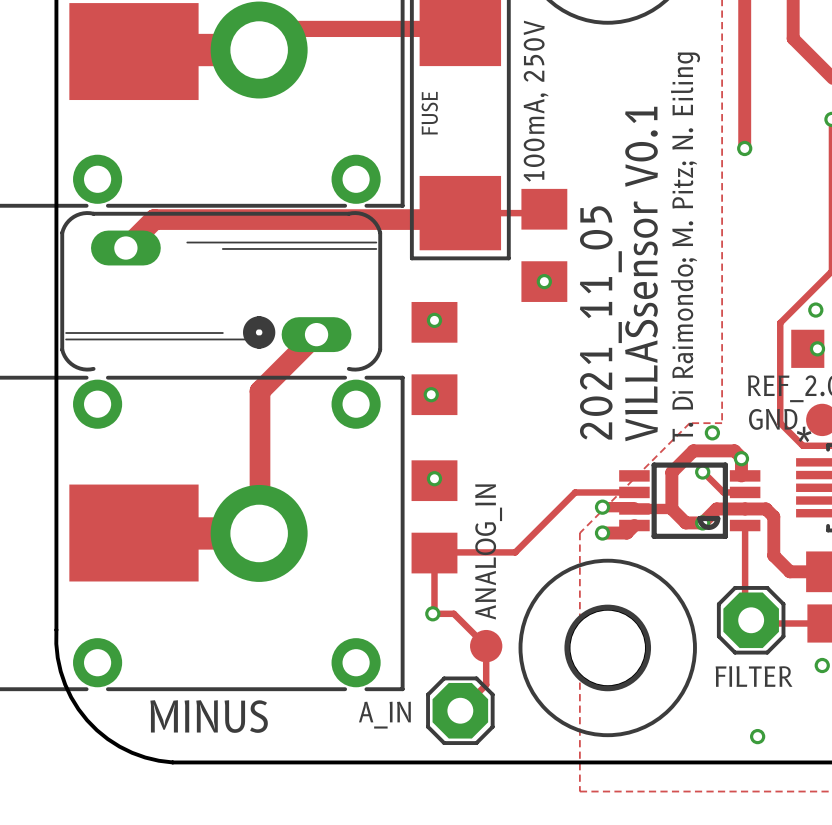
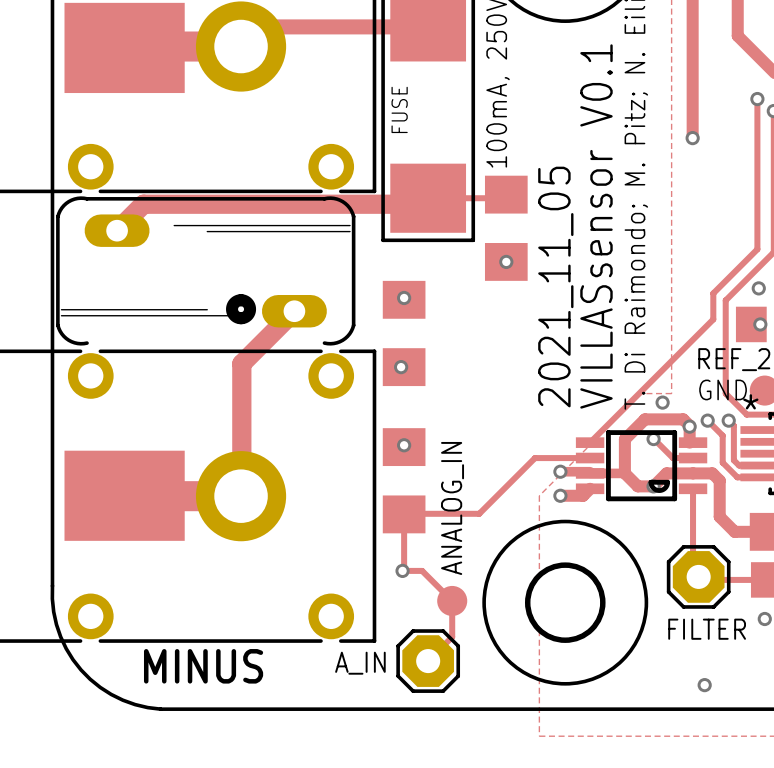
track: none -> (757, 99) (757, 249) (713, 293) (713, 319) (590, 442)
via: none -> (757, 99)
track: none -> (707, 420) (722, 435) (722, 462) (737, 477) (758, 477)
via: none -> (707, 420)
track: none -> (728, 420) (733, 425) (733, 460) (739, 465) (758, 465)
via: none -> (728, 420)

